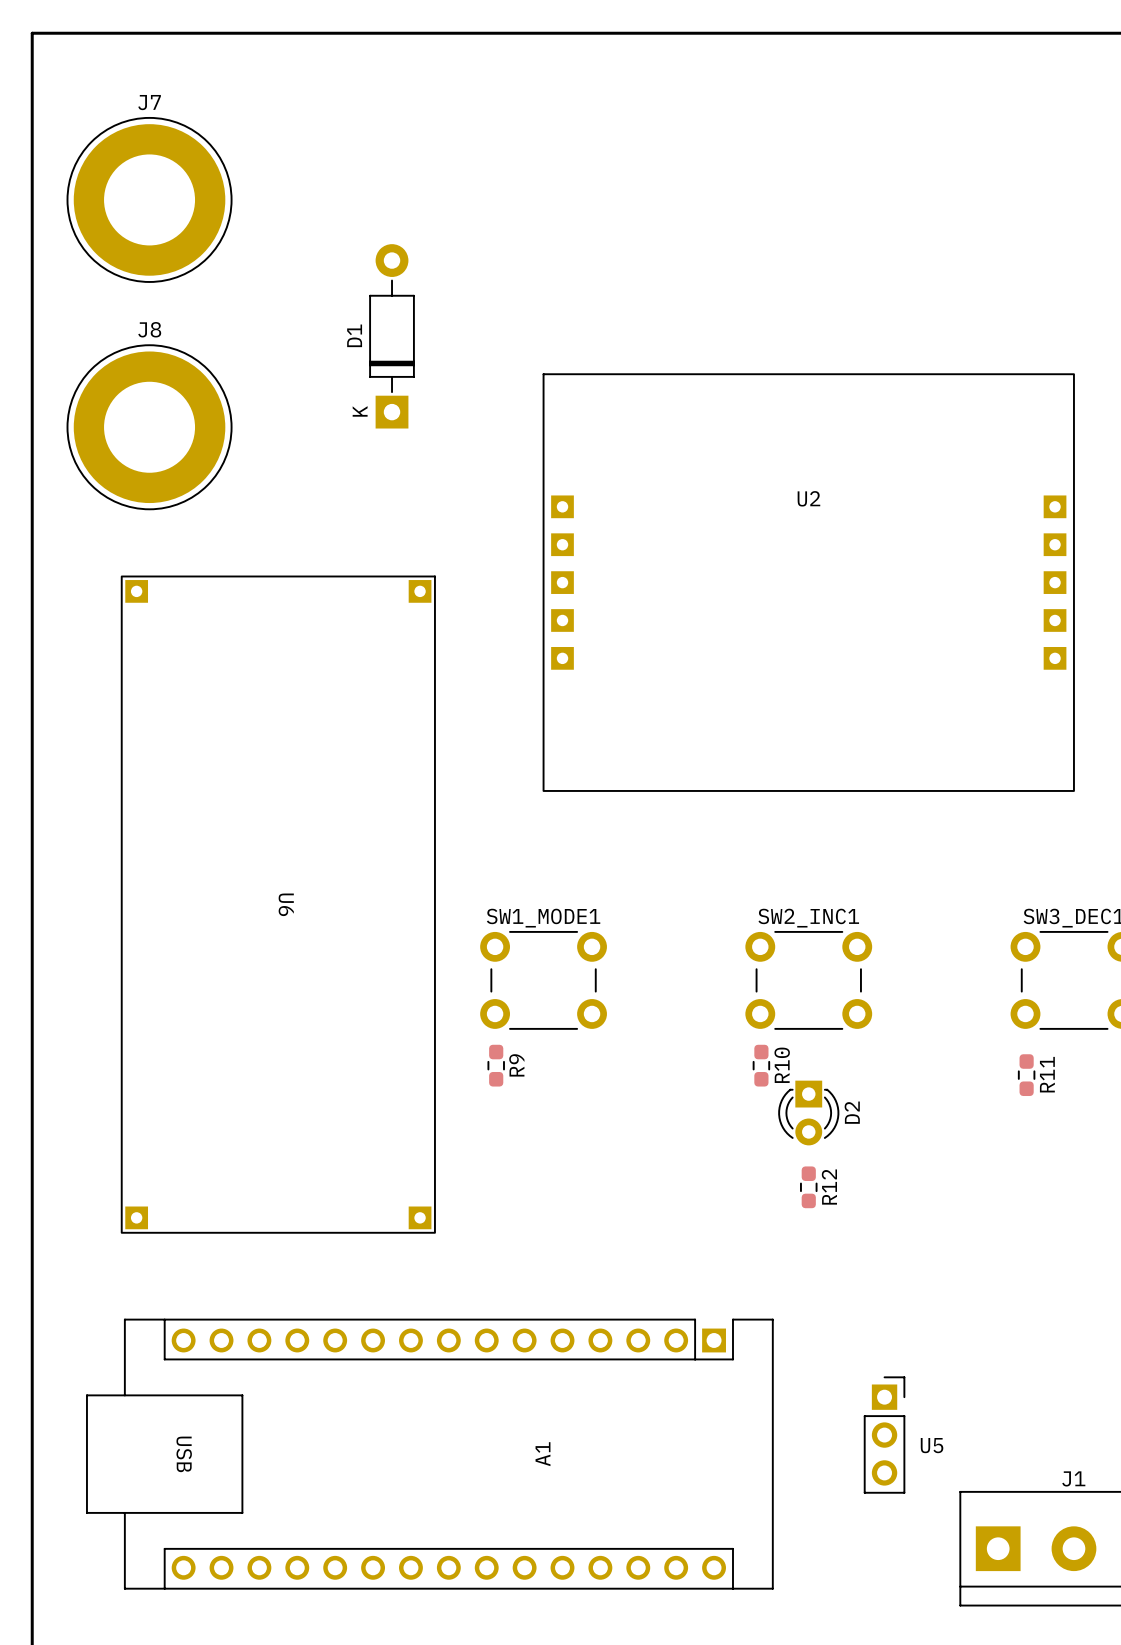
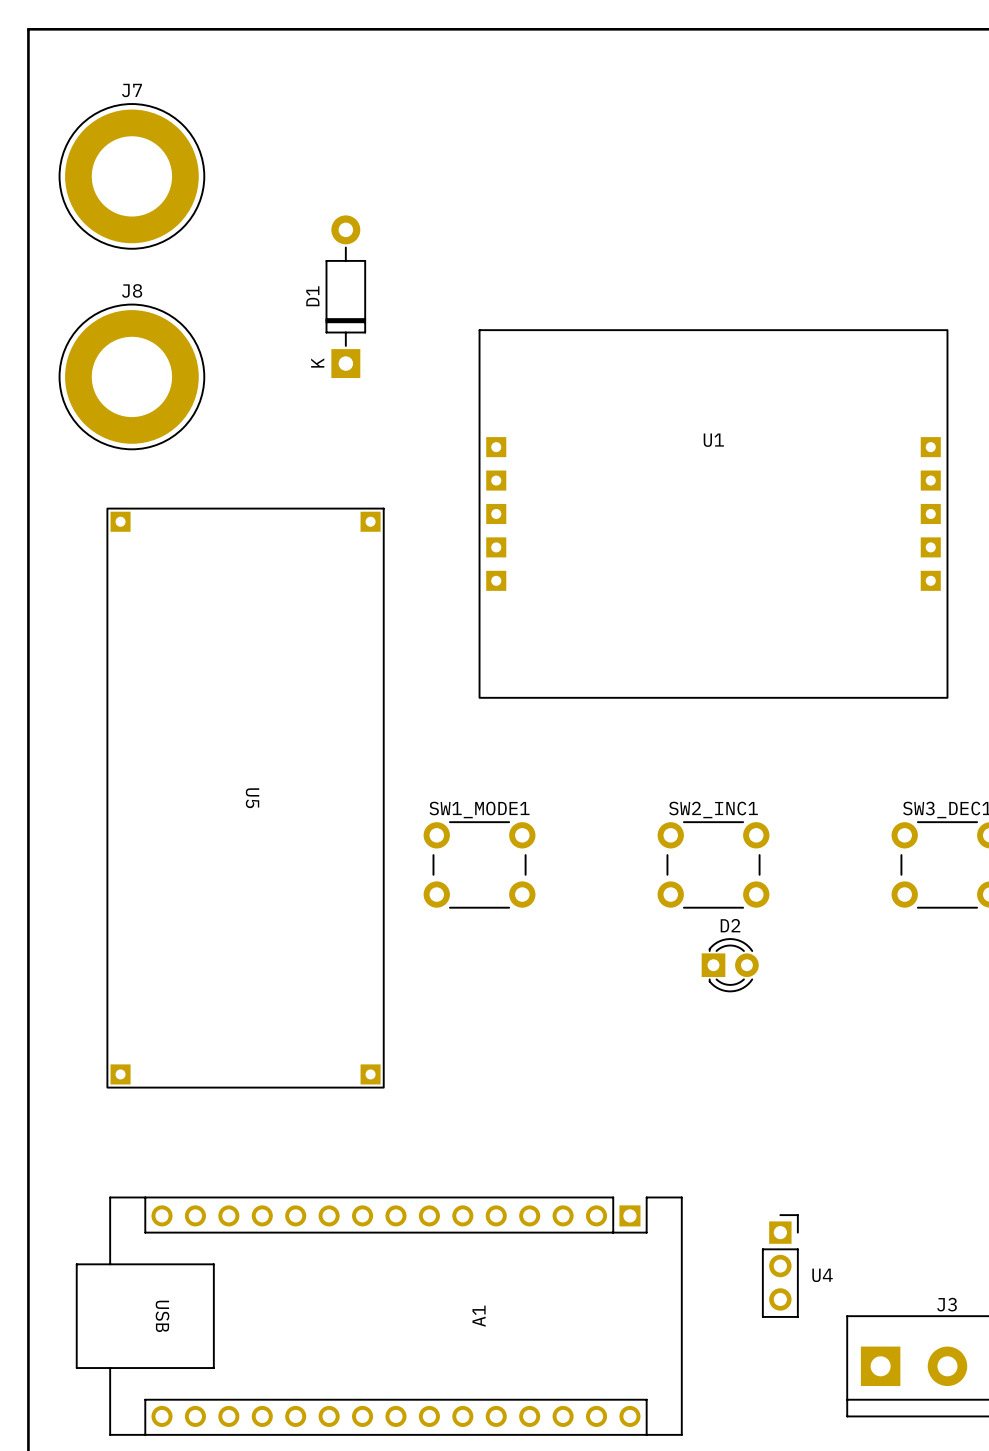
U2 name: U2 (808, 498) -> U1 (713, 440)
U6 name: U6 (286, 904) -> U5 (252, 798)
R9: (496, 1065) -> none
R10: (761, 1065) -> none
R11: (1026, 1075) -> none
D2 rotation: 0° (808, 1113) -> 90° counterclockwise (730, 965)
R12: (808, 1187) -> none
U5 name: U5 (932, 1445) -> U4 (822, 1275)
A1 position: (429, 1454) -> (379, 1316)
J1 name: J1 (1073, 1478) -> J3 (947, 1304)

